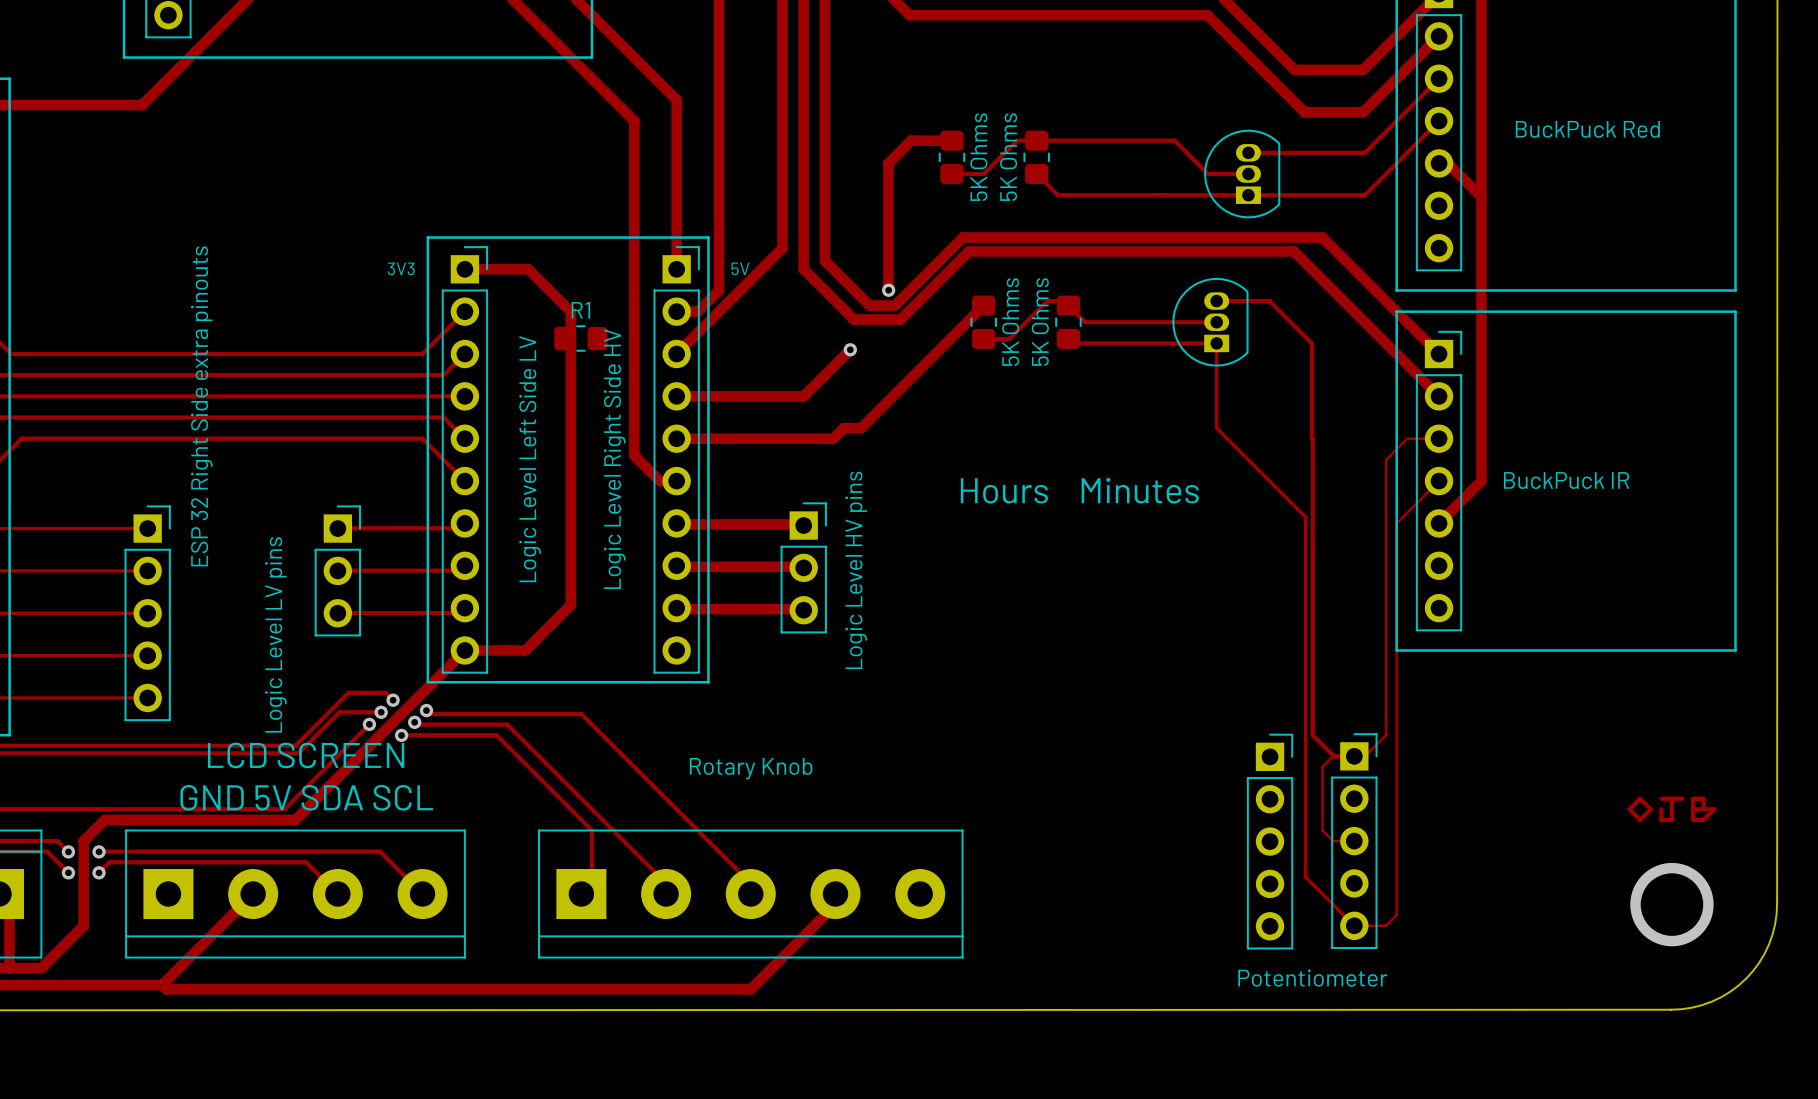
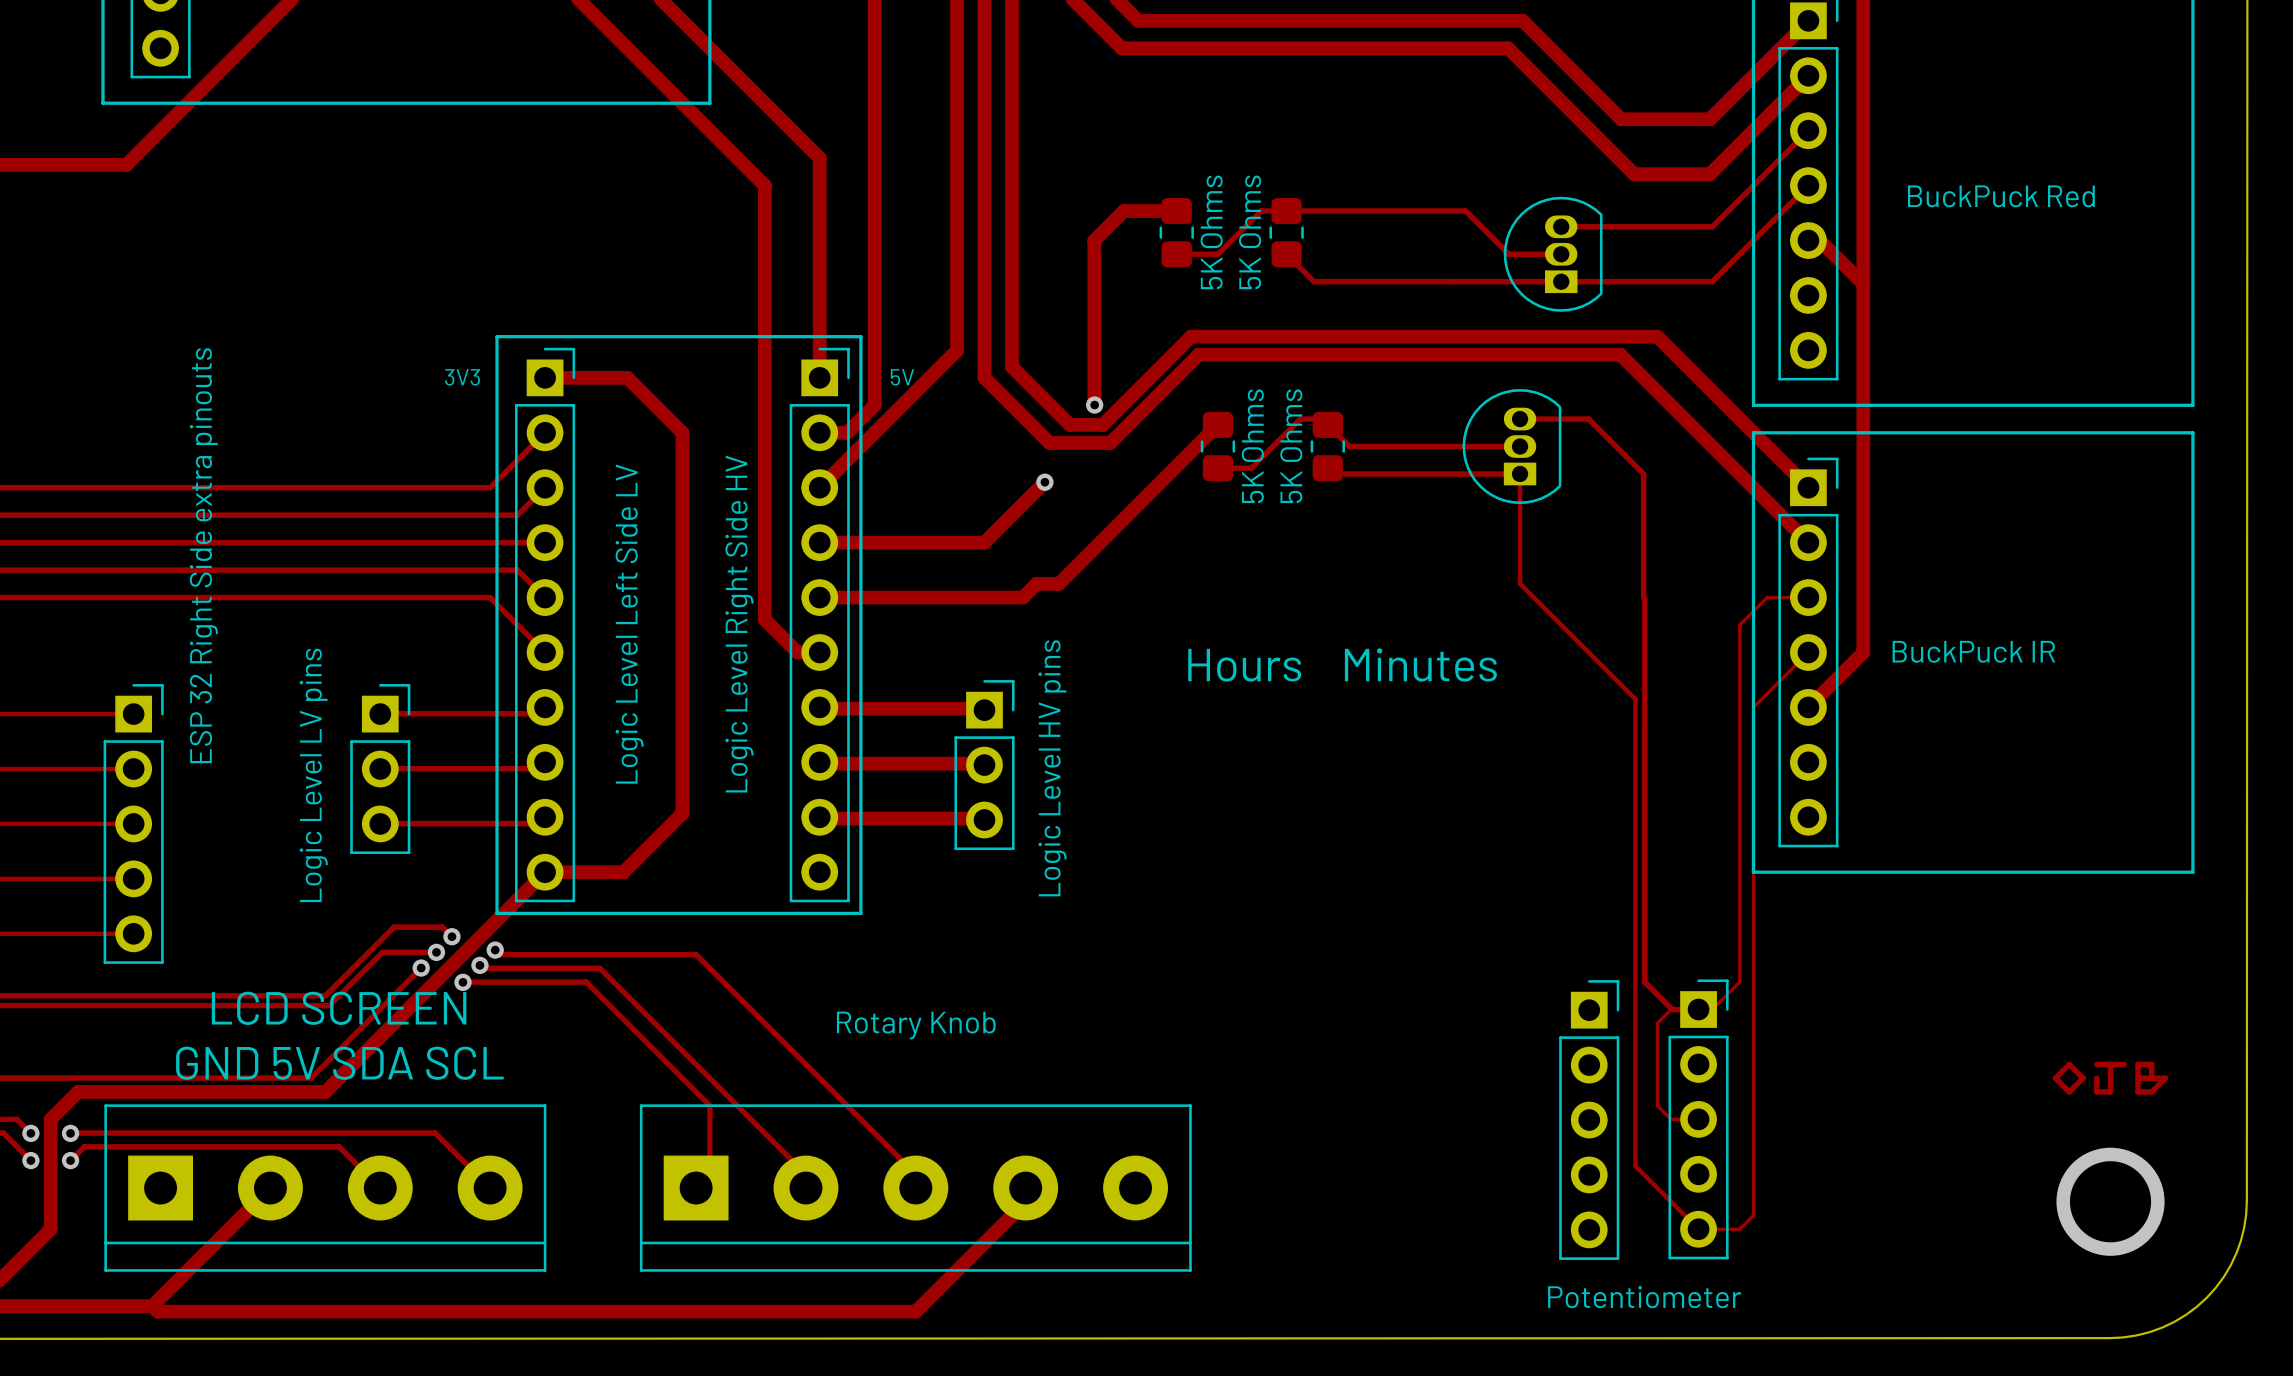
R1: (580, 338) -> none
part value position: Logic Level LV pins (275, 634) -> Logic Level LV pins (313, 775)

